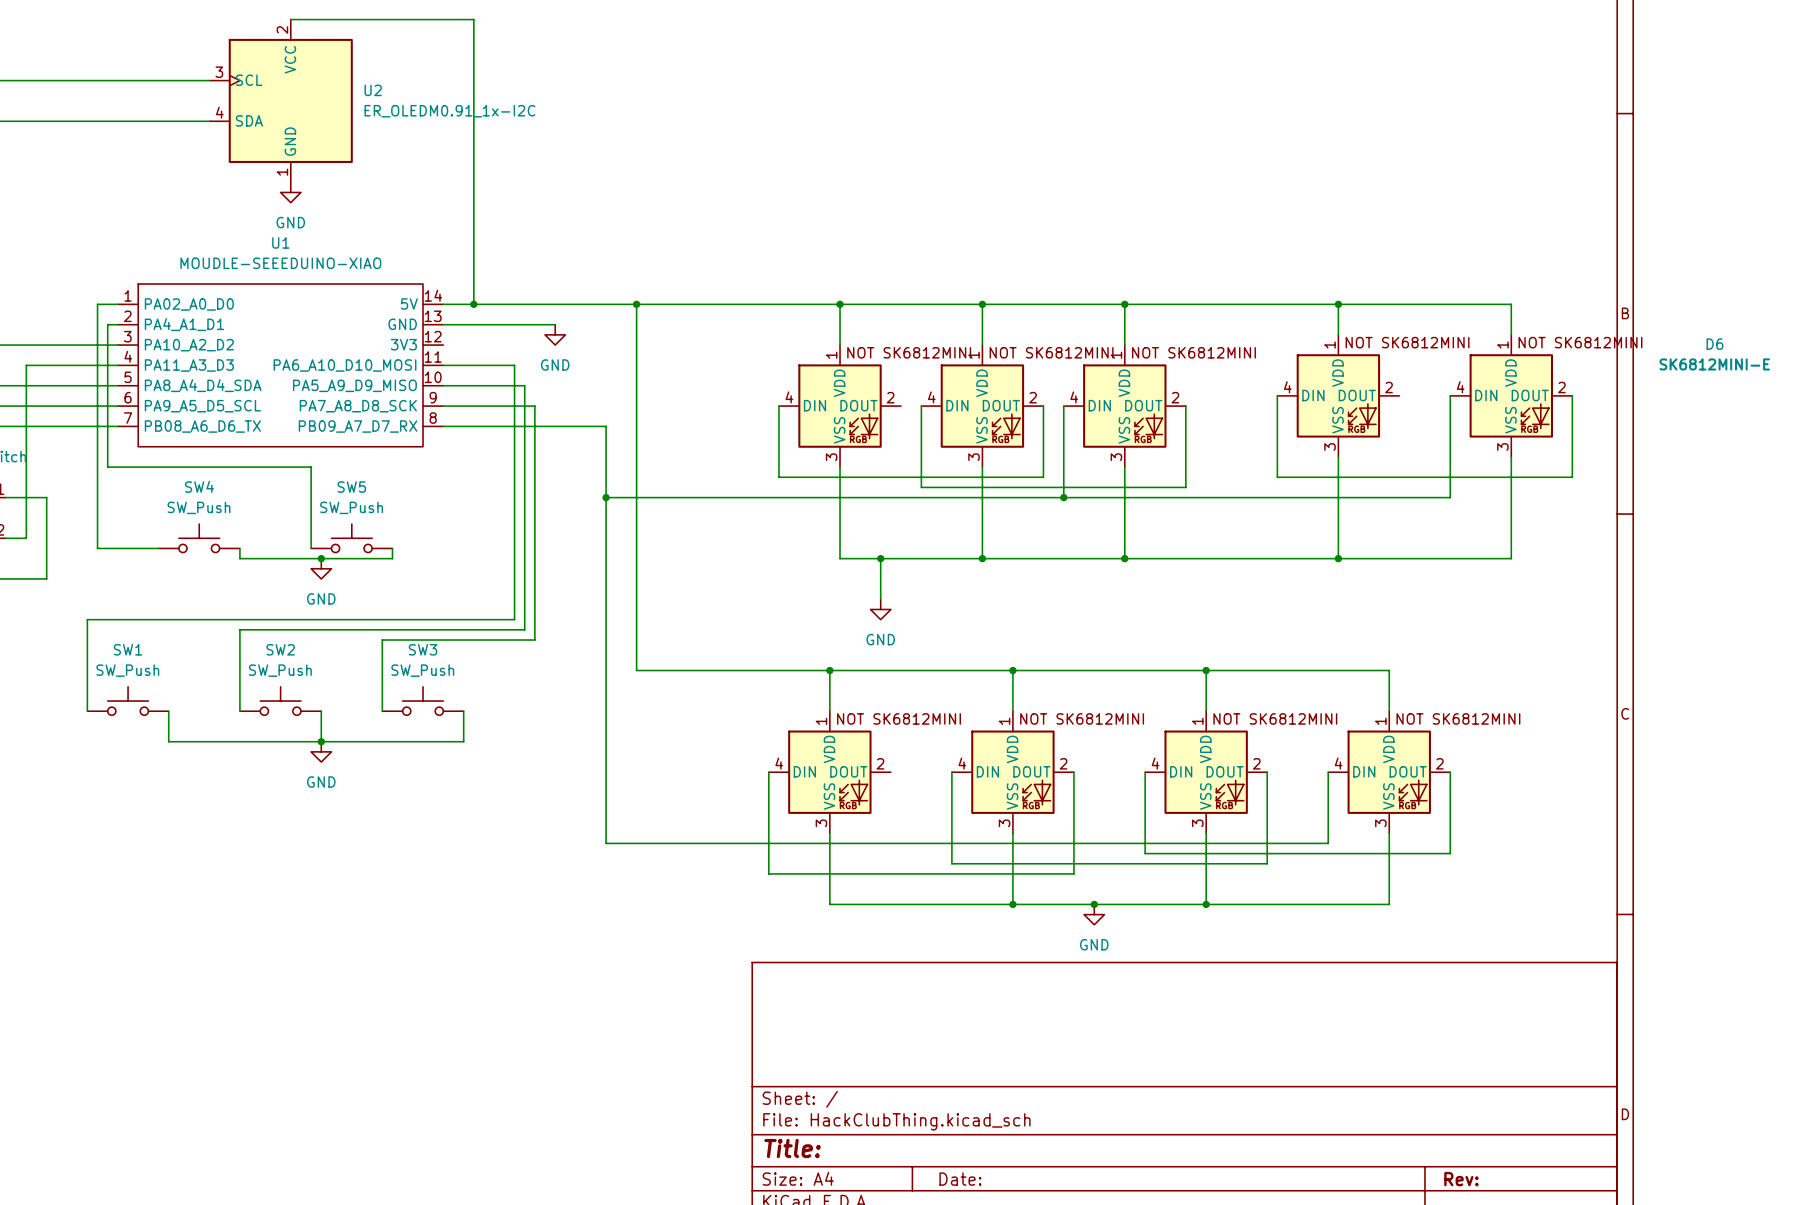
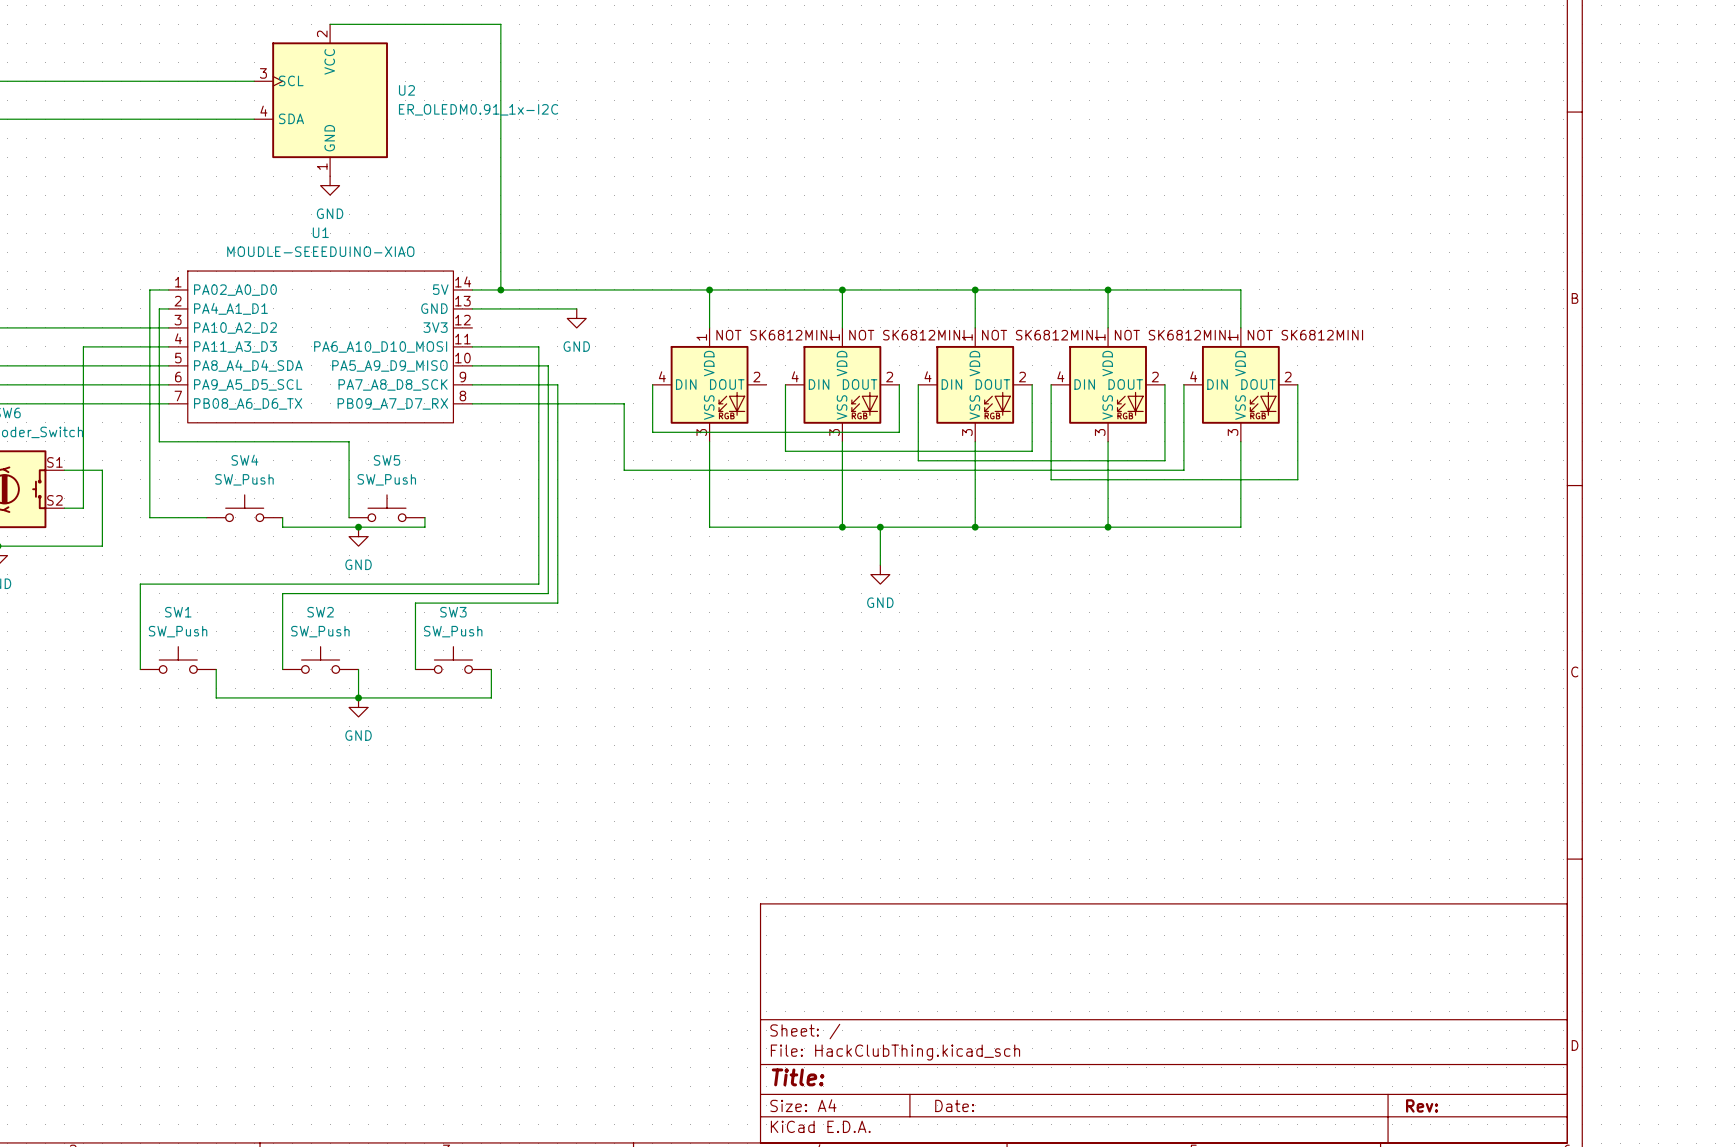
wire: (636, 304) (636, 406) -> none
junction: (636, 304) -> none
wire: none -> (709, 289) (709, 327)
junction: none -> (709, 289)
wire: (1267, 304) (1511, 304) (1511, 334) -> (1240, 289) (1240, 327)
wire: (1338, 304) (1338, 334) -> none
junction: (1338, 304) -> none
wire: (1277, 395) (1277, 477) (1572, 477) (1572, 395) -> none
part position: (1338, 395) -> (1240, 384)
wire: (1450, 395) (1450, 497) (1206, 497) -> (1183, 384) (1183, 470)
D6: SK6812MINI-E (1511, 395) -> none
part: none -> (709, 384)
wire: none -> (1297, 384) (1297, 479) (1051, 479) (1051, 470)
wire: (636, 456) (636, 670) (1389, 670) (1389, 711) -> (652, 432) (899, 432) (899, 384)
wire: (1338, 456) (1338, 558) -> none
wire: (1511, 456) (1511, 558) (1267, 558) -> (1240, 441) (1240, 527)
wire: none -> (709, 441) (709, 527) (842, 527)
wire: (606, 497) (606, 843) (1328, 843) (1328, 772) -> none
junction: (606, 497) -> none
junction: (1063, 497) -> none
junction: none -> (842, 527)
junction: (1338, 558) -> none
wire: (829, 670) (829, 711) -> none
junction: (829, 670) -> none
wire: (1012, 670) (1012, 711) -> none
junction: (1012, 670) -> none
wire: (1206, 670) (1206, 711) -> none
junction: (1206, 670) -> none
wire: (768, 772) (768, 873) (1073, 873) (1073, 772) -> none
part: (829, 772) -> none
wire: (951, 772) (951, 863) (1267, 863) (1267, 772) -> none
part: (1012, 772) -> none
wire: (1145, 772) (1145, 853) (1450, 853) (1450, 772) -> none
part: (1206, 772) -> none
part: (1389, 772) -> none
wire: (829, 833) (829, 904) (1389, 904) (1389, 833) -> none
wire: (1012, 833) (1012, 904) -> none
wire: (1206, 833) (1206, 904) -> none
junction: (1012, 904) -> none
junction: (1094, 904) -> none
junction: (1206, 904) -> none
power symbol: GND (1094, 914) -> none

